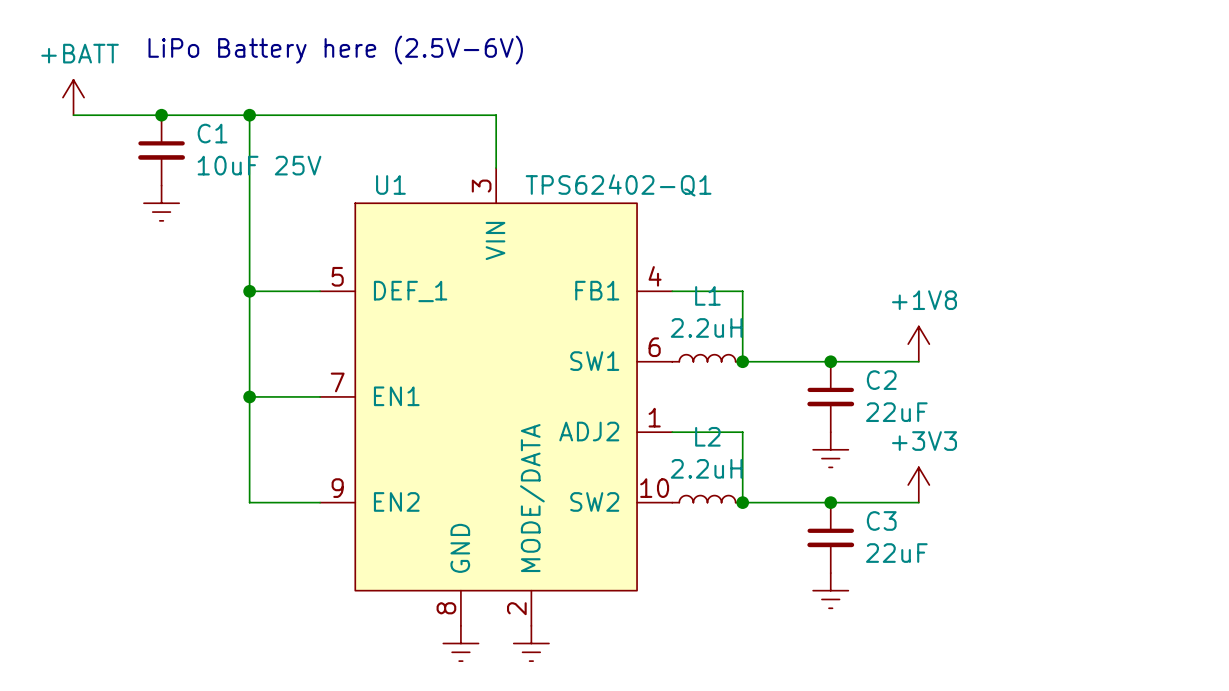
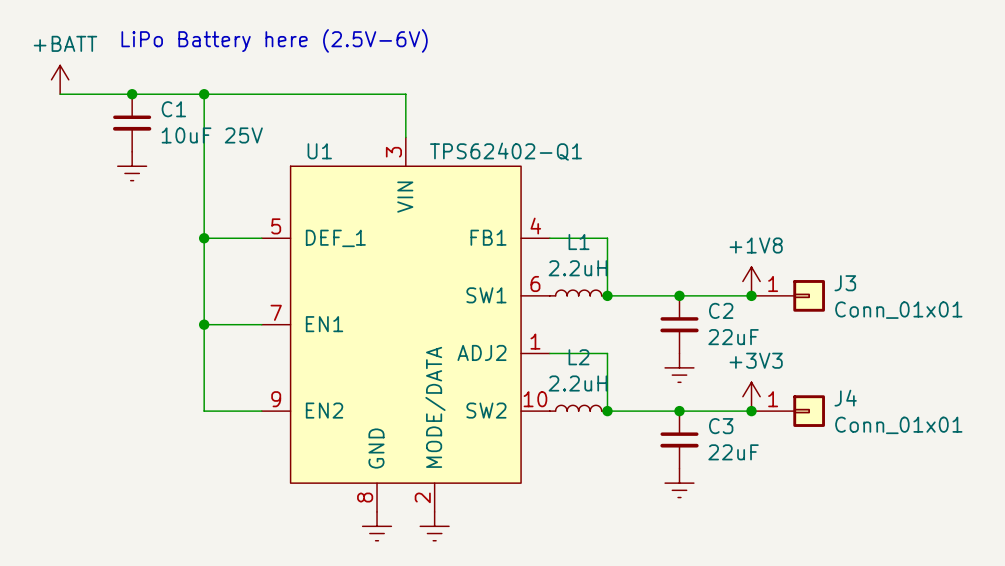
junction: none -> (751, 295)
J3: none -> Conn_01x01 (788, 295)
junction: none -> (751, 411)
J4: none -> Conn_01x01 (788, 411)

